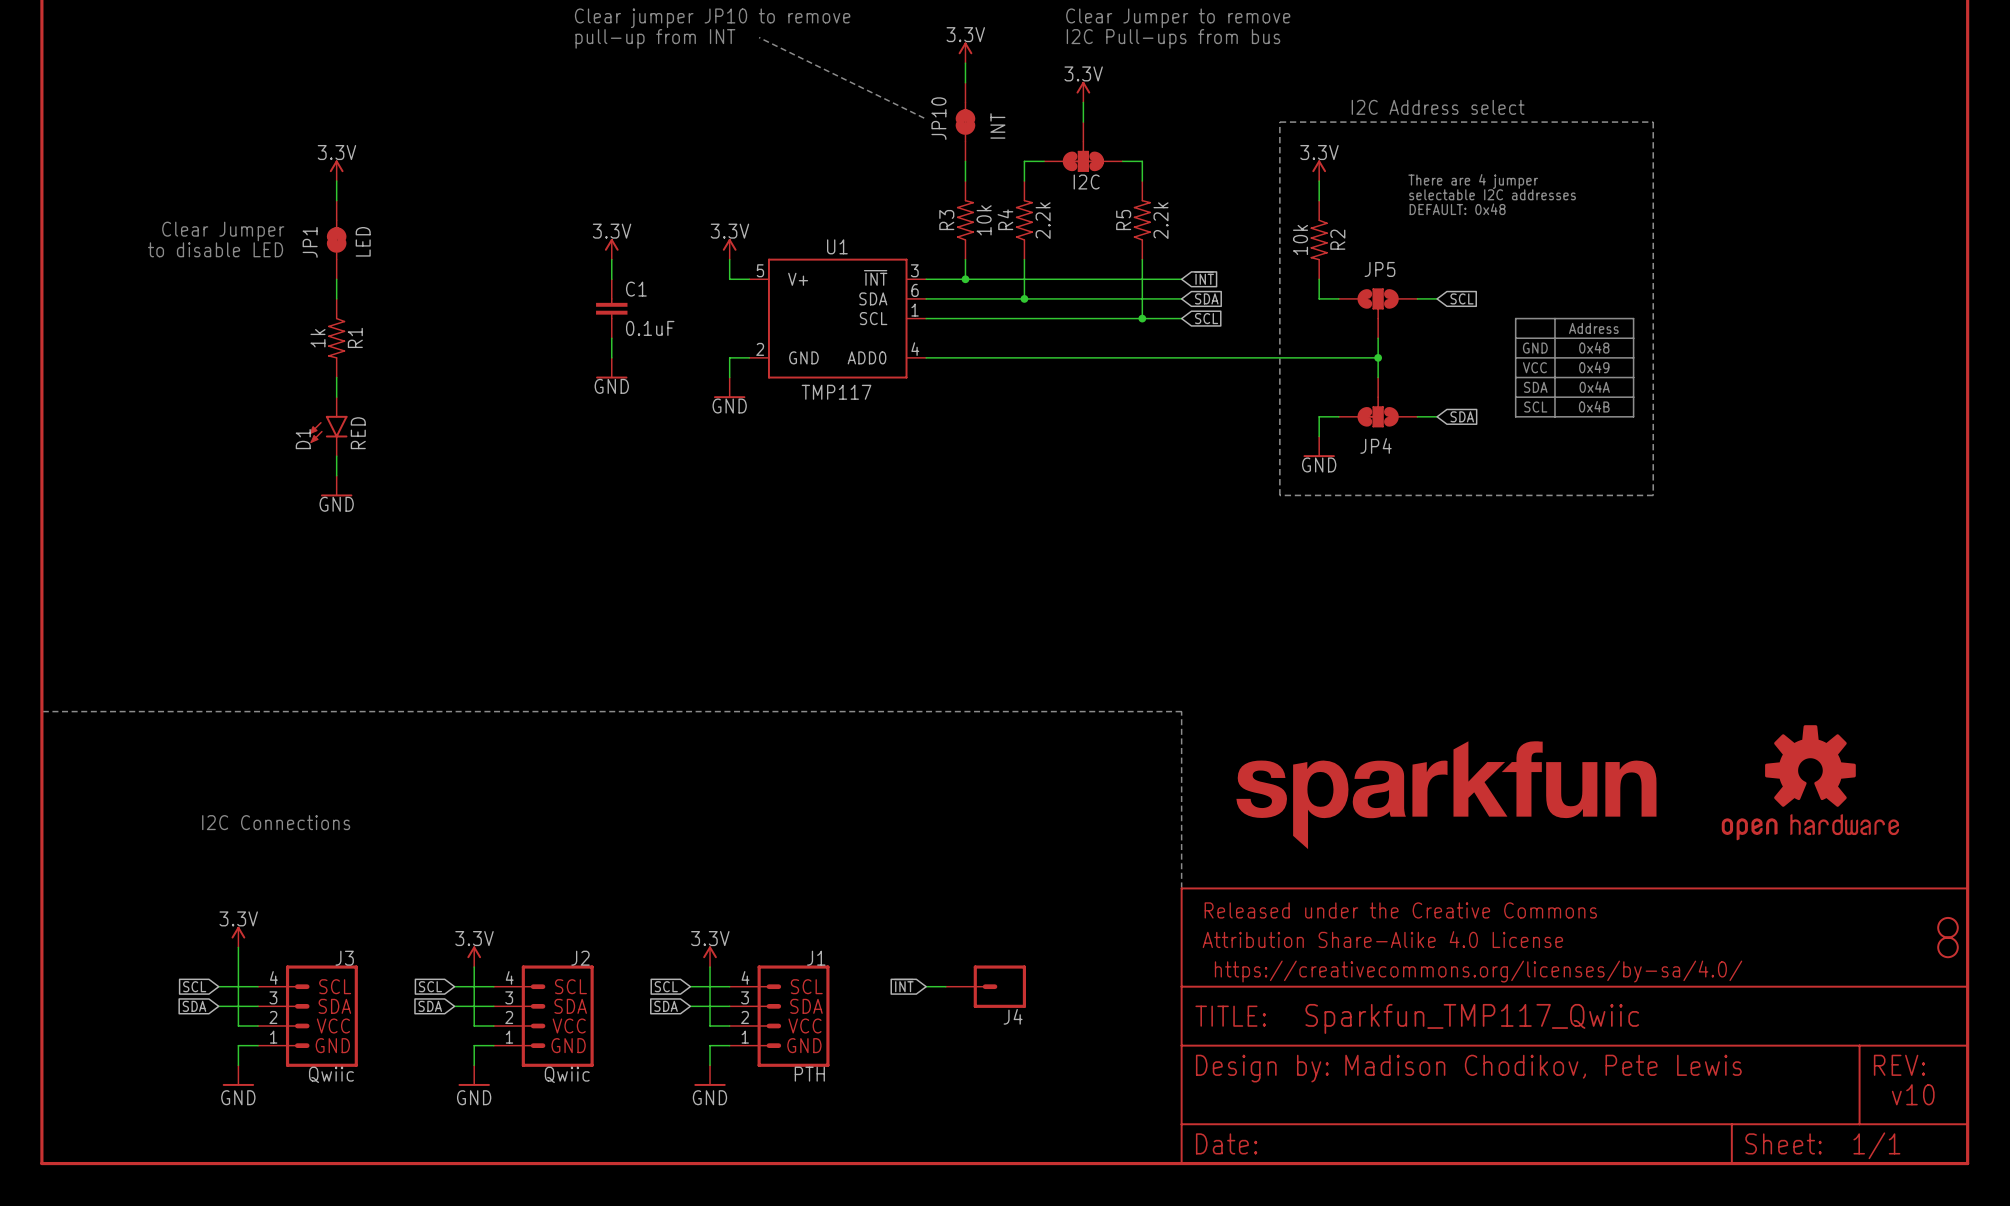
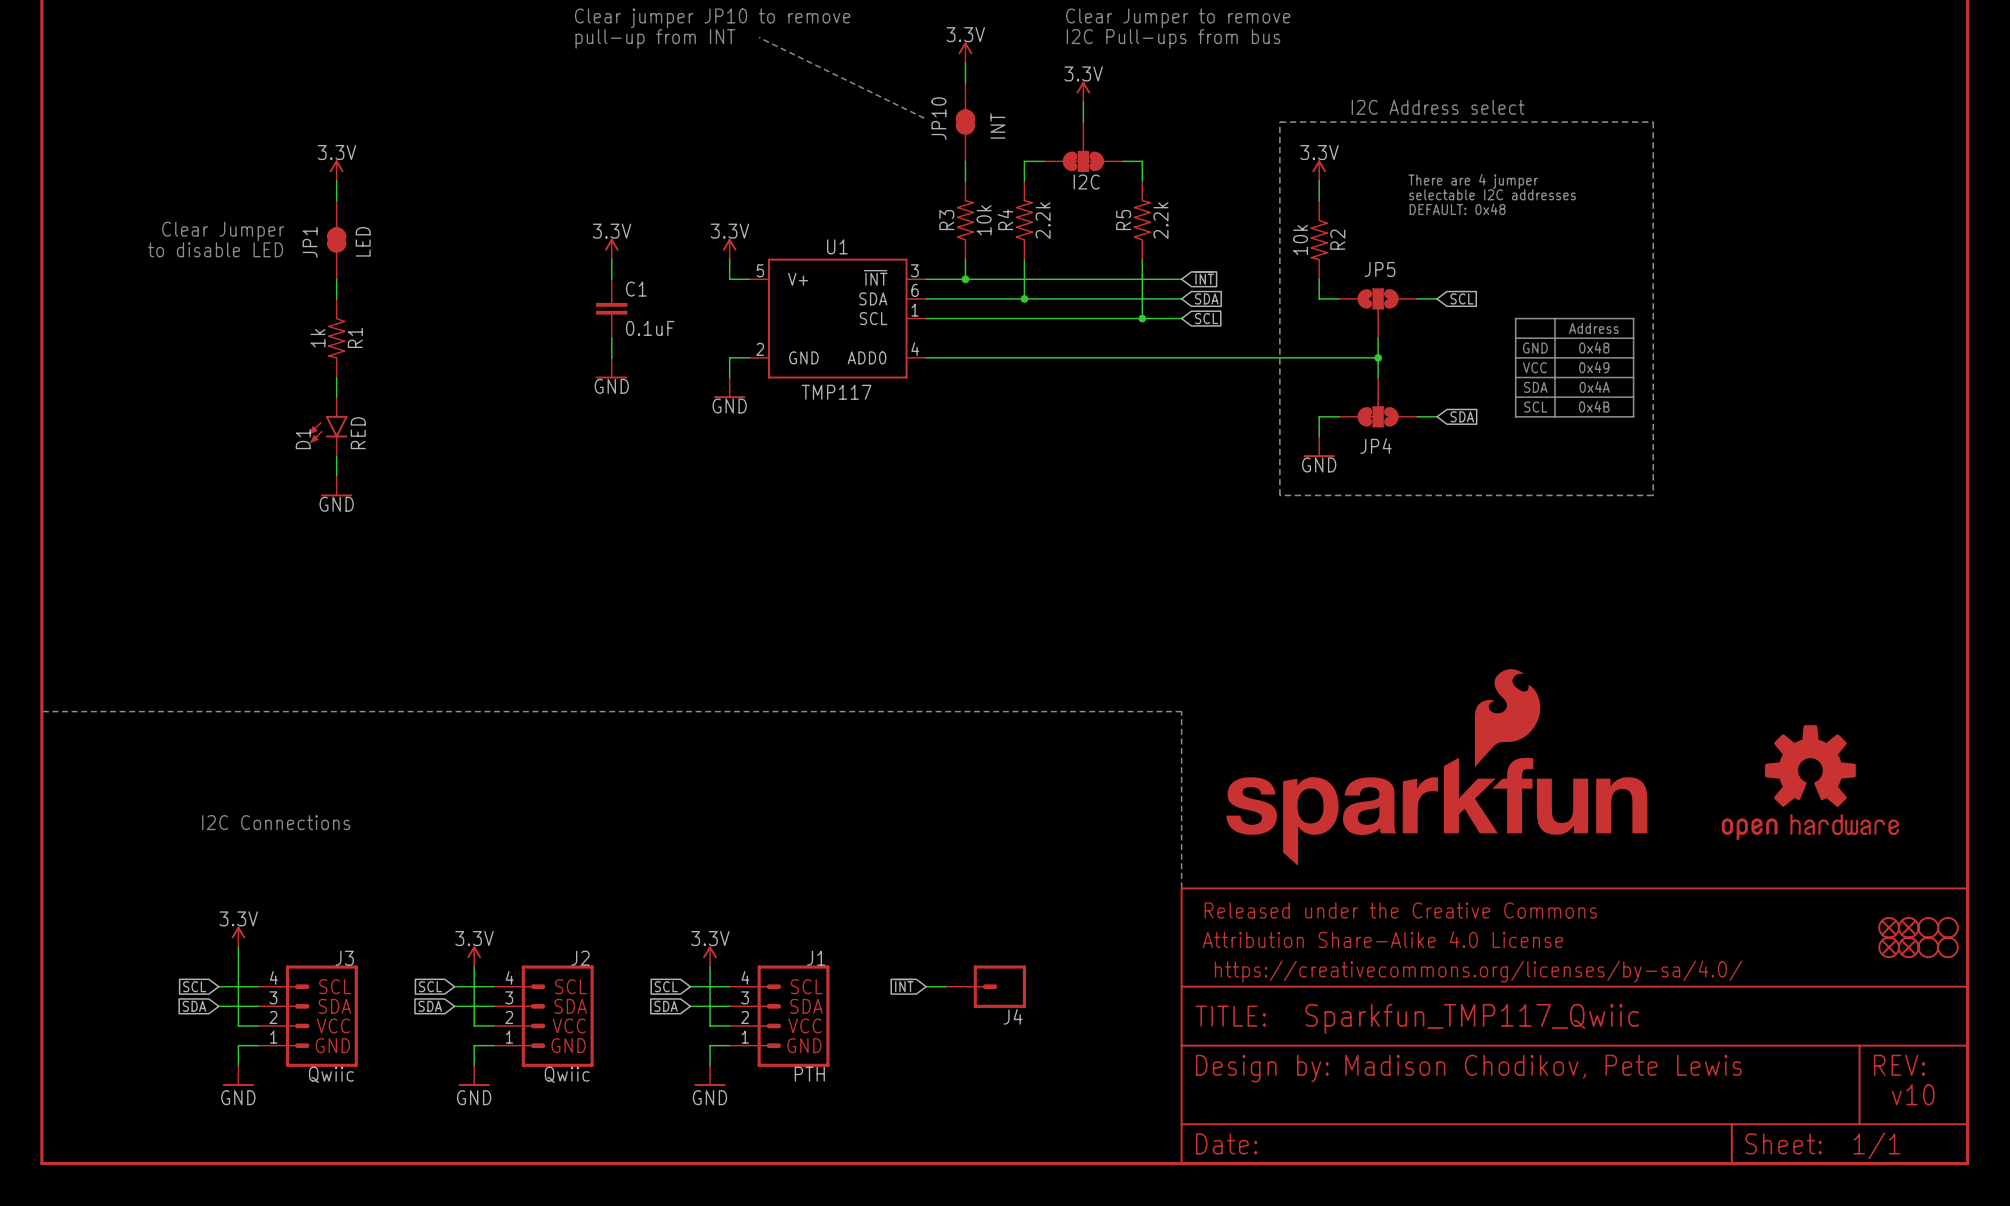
part: none -> (1436, 767)
part: (1446, 795) -> none
part: none -> (1889, 927)
part: none -> (1908, 927)
part: none -> (1928, 927)
part: none -> (1889, 947)
part: none -> (1908, 947)
part: none -> (1928, 947)

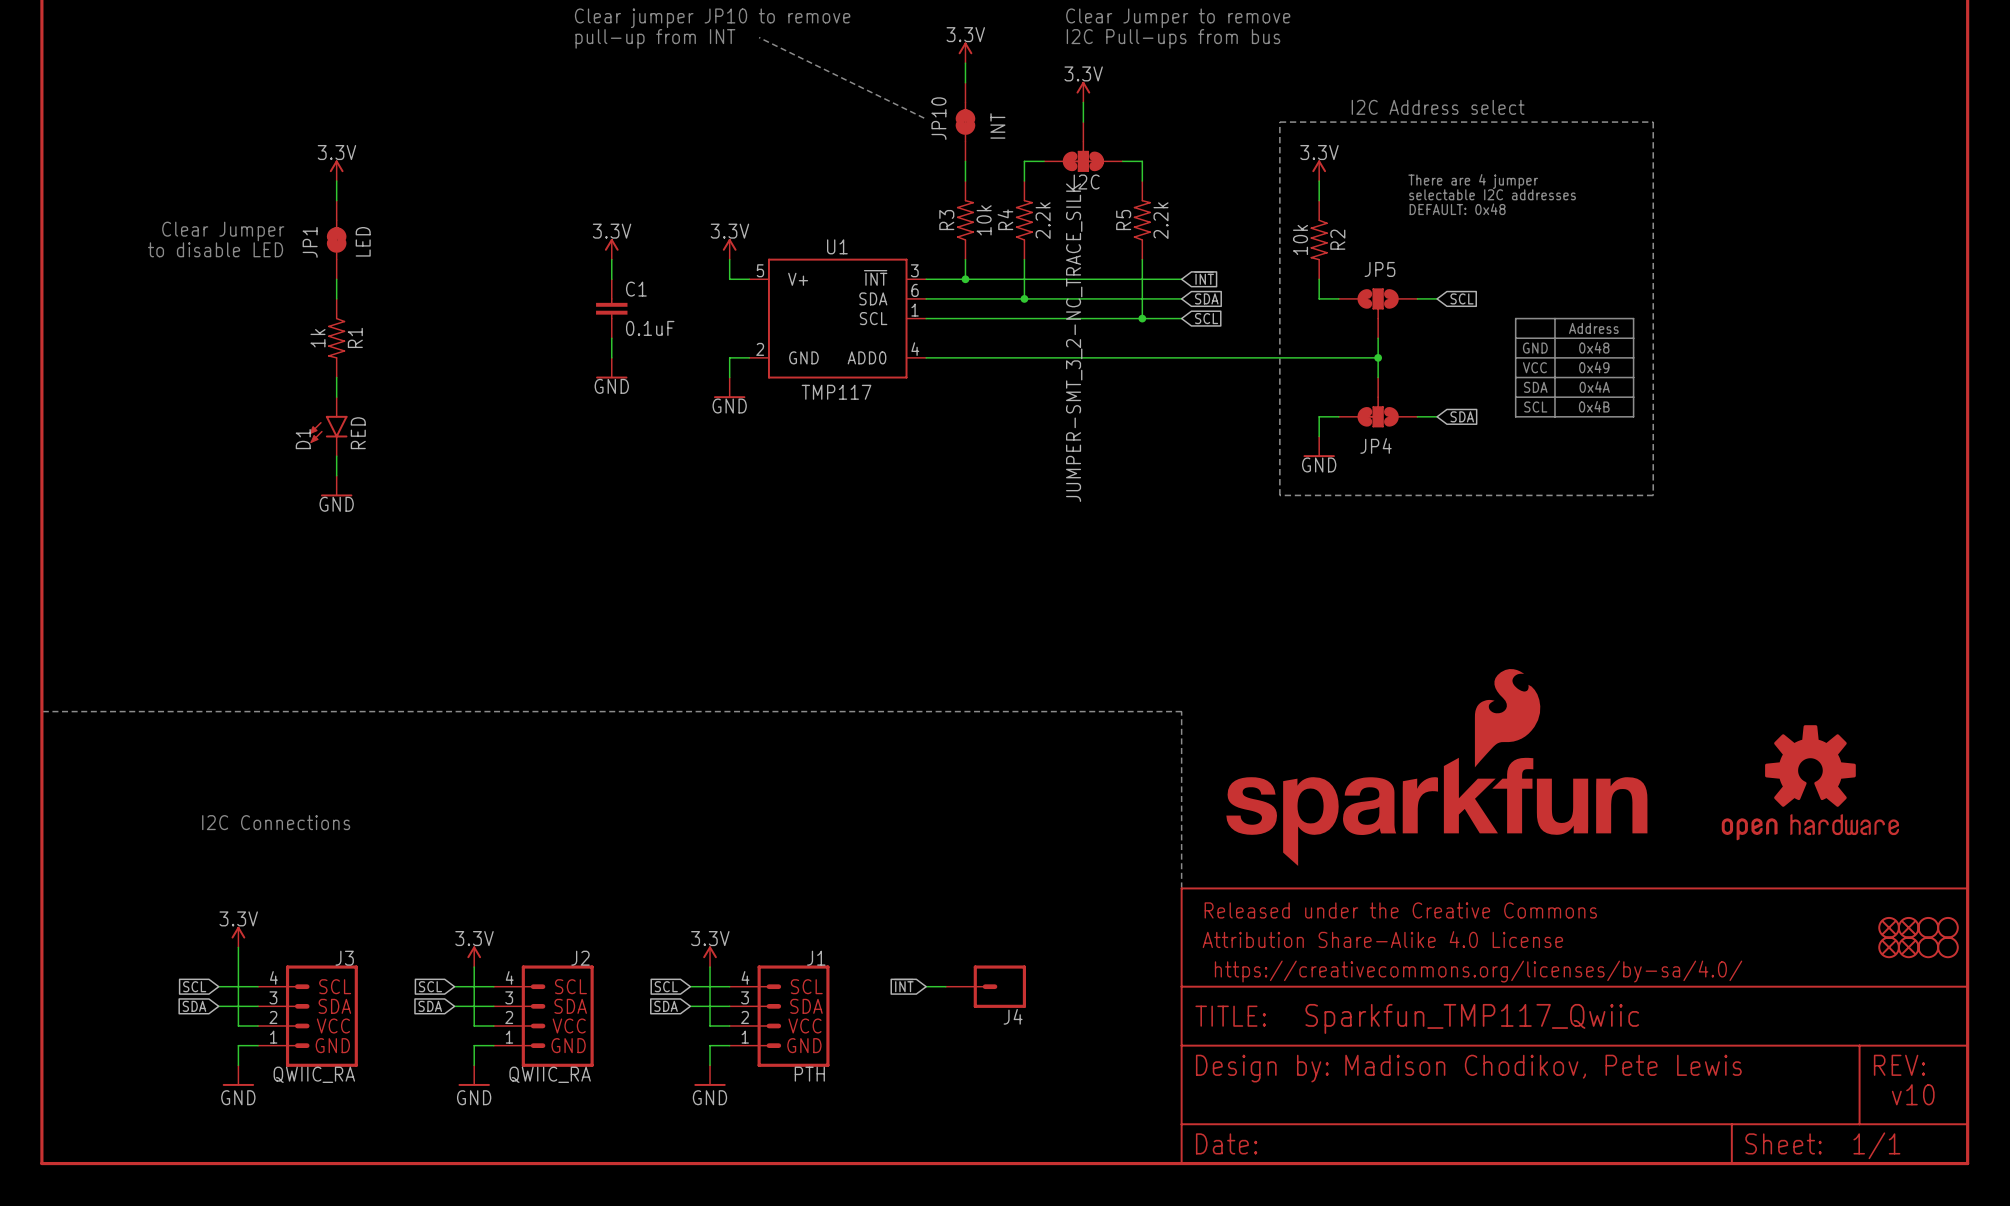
I2C value: none -> JUMPER-SMT_3_2-NC_TRACE_SILK (1074, 342)
J3 value: Qwiic (331, 1074) -> QWIIC_RA (314, 1074)
J2 value: Qwiic (567, 1074) -> QWIIC_RA (550, 1074)

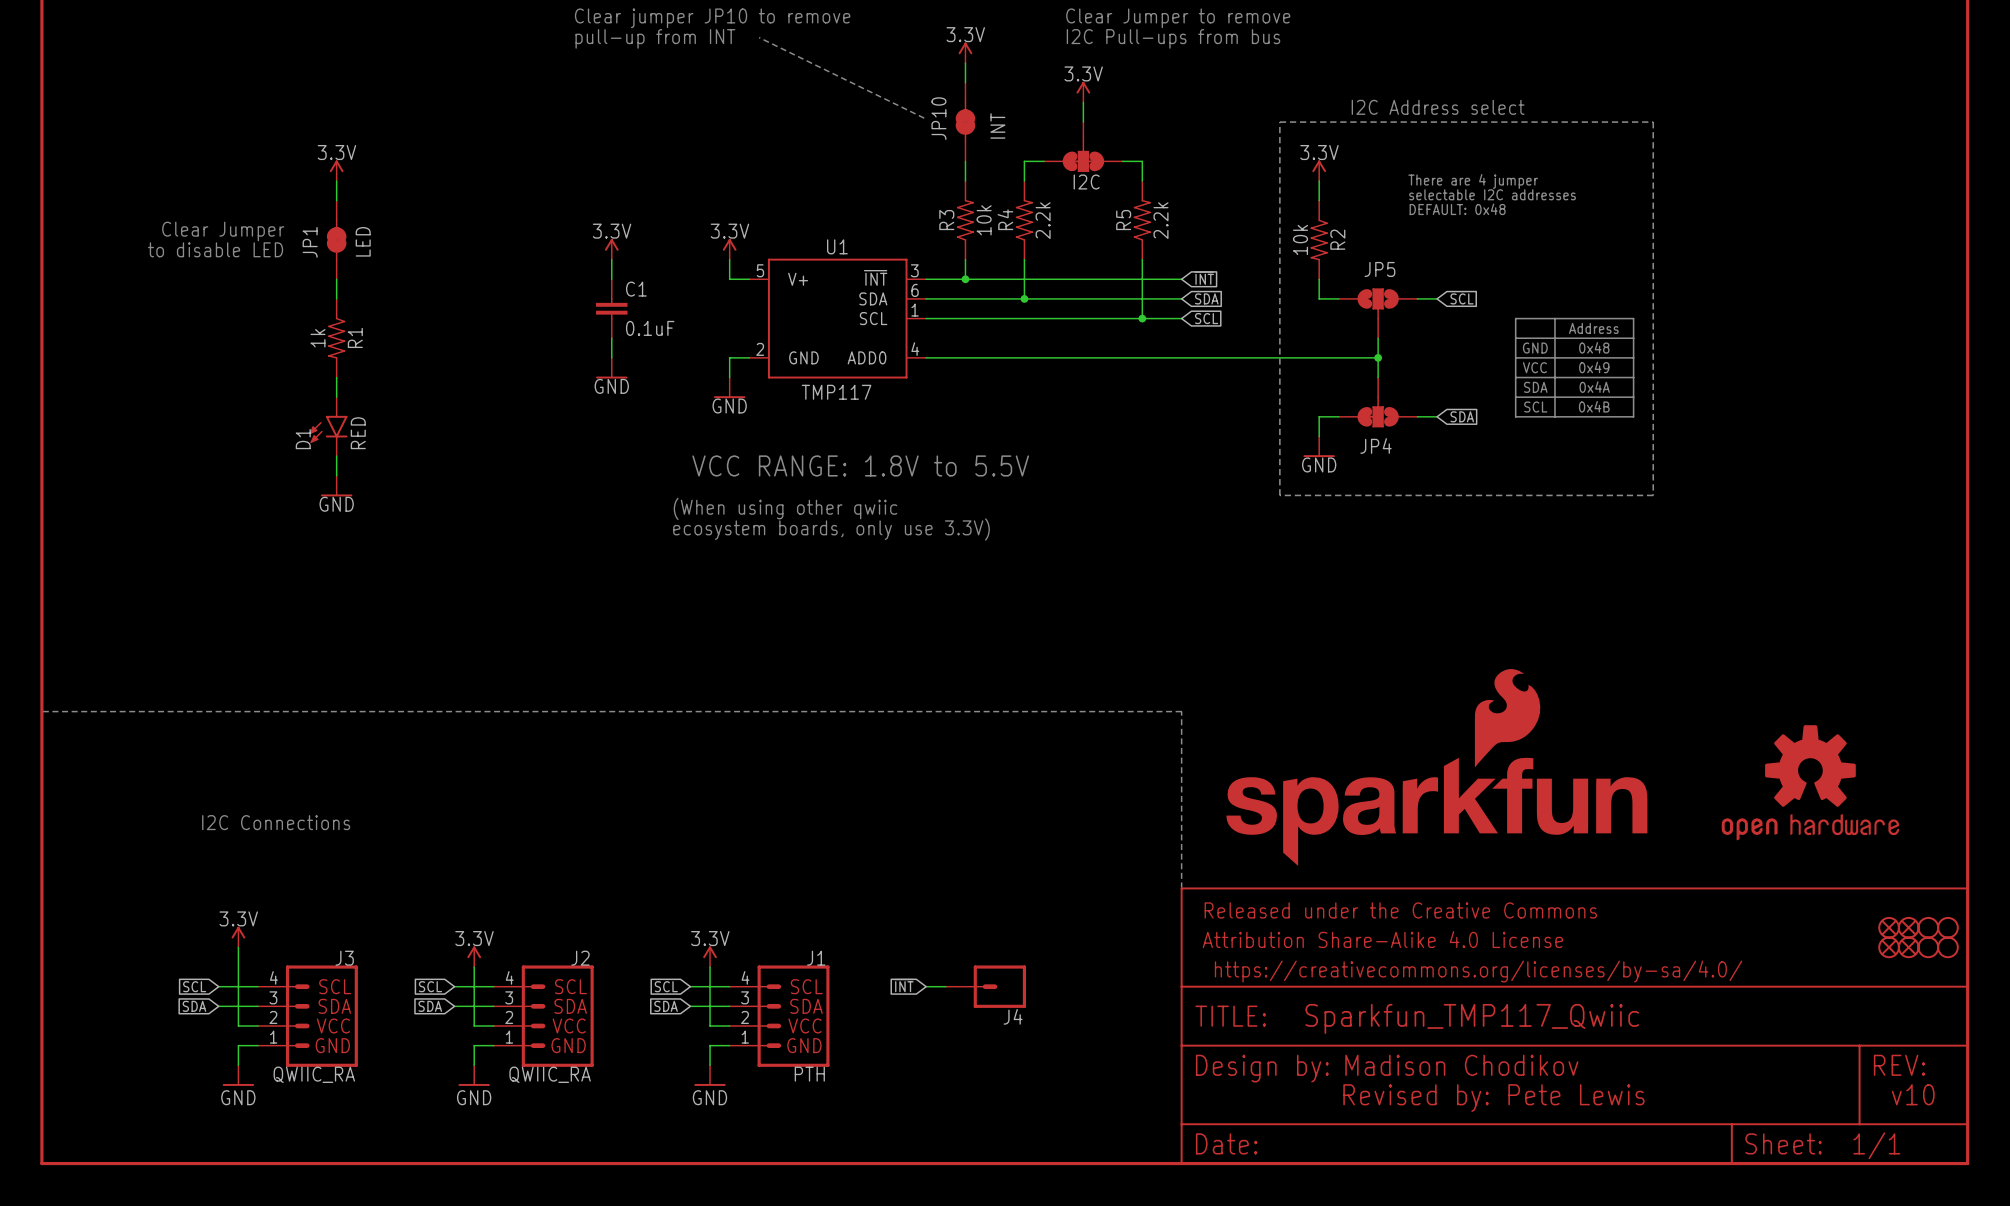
I2C value: JUMPER-SMT_3_2-NC_TRACE_SILK (1074, 342) -> none
text: none -> VCC RANGE: 1.8V to 5.5V (860, 465)
text: none -> (When using other qwiic (785, 508)
text: none -> ecosystem boards, only use 3.3V) (831, 529)
text: Madison Chodikov, Pete Lewis (1543, 1066) -> Madison Chodikov (1461, 1065)
text: none -> Revised by: Pete Lewis (1493, 1098)

